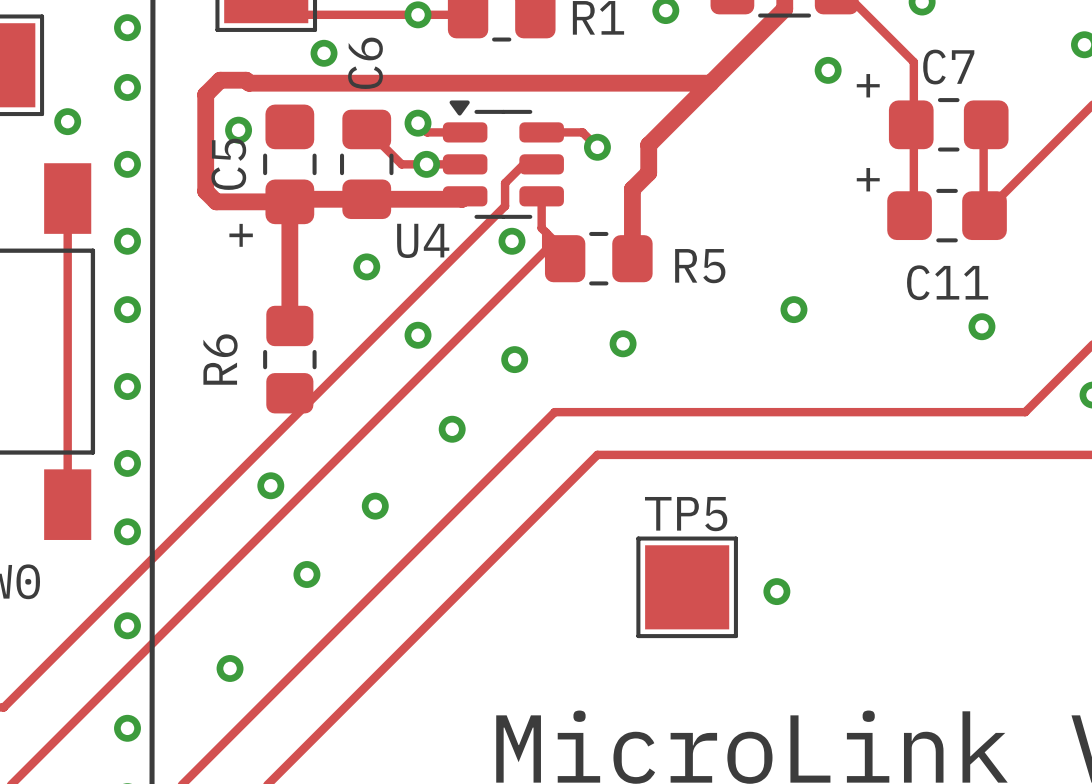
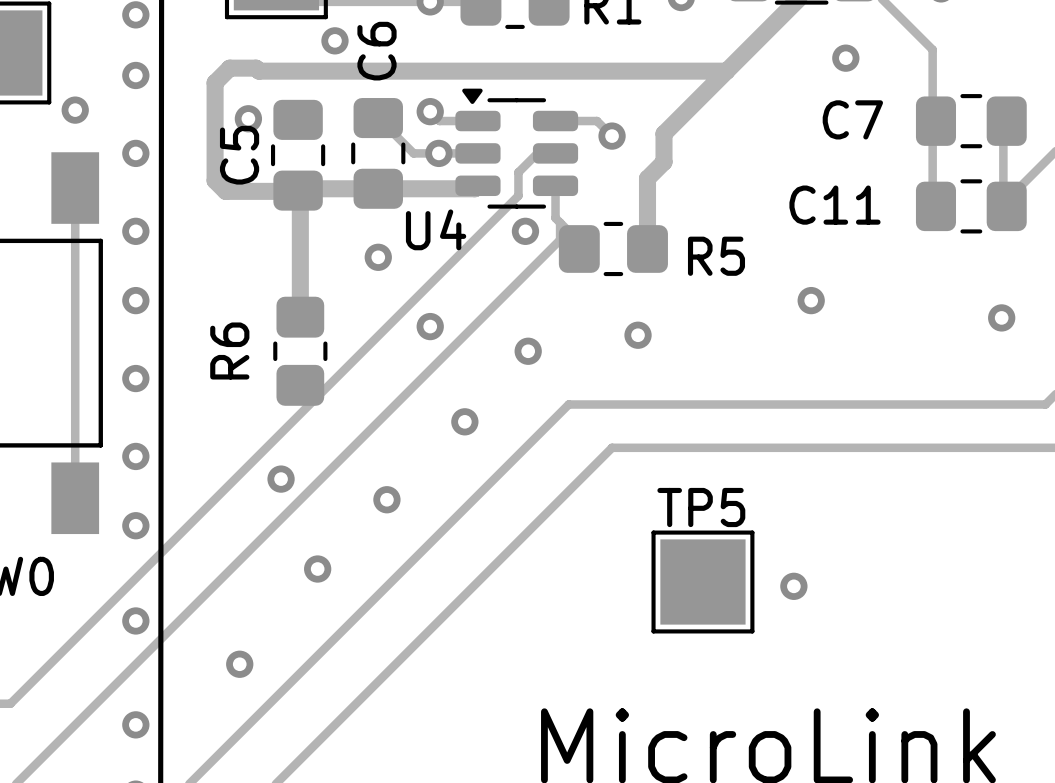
C7 name position: C7 (948, 67) -> C7 (852, 119)
C7 footprint: [888, 98, 1009, 152] -> [915, 94, 1027, 149]
C5 footprint: [263, 104, 317, 225] -> [270, 99, 326, 211]
C11 footprint: [887, 188, 1007, 243] -> [915, 179, 1027, 234]
C11 name position: C11 (947, 282) -> C11 (834, 205)

